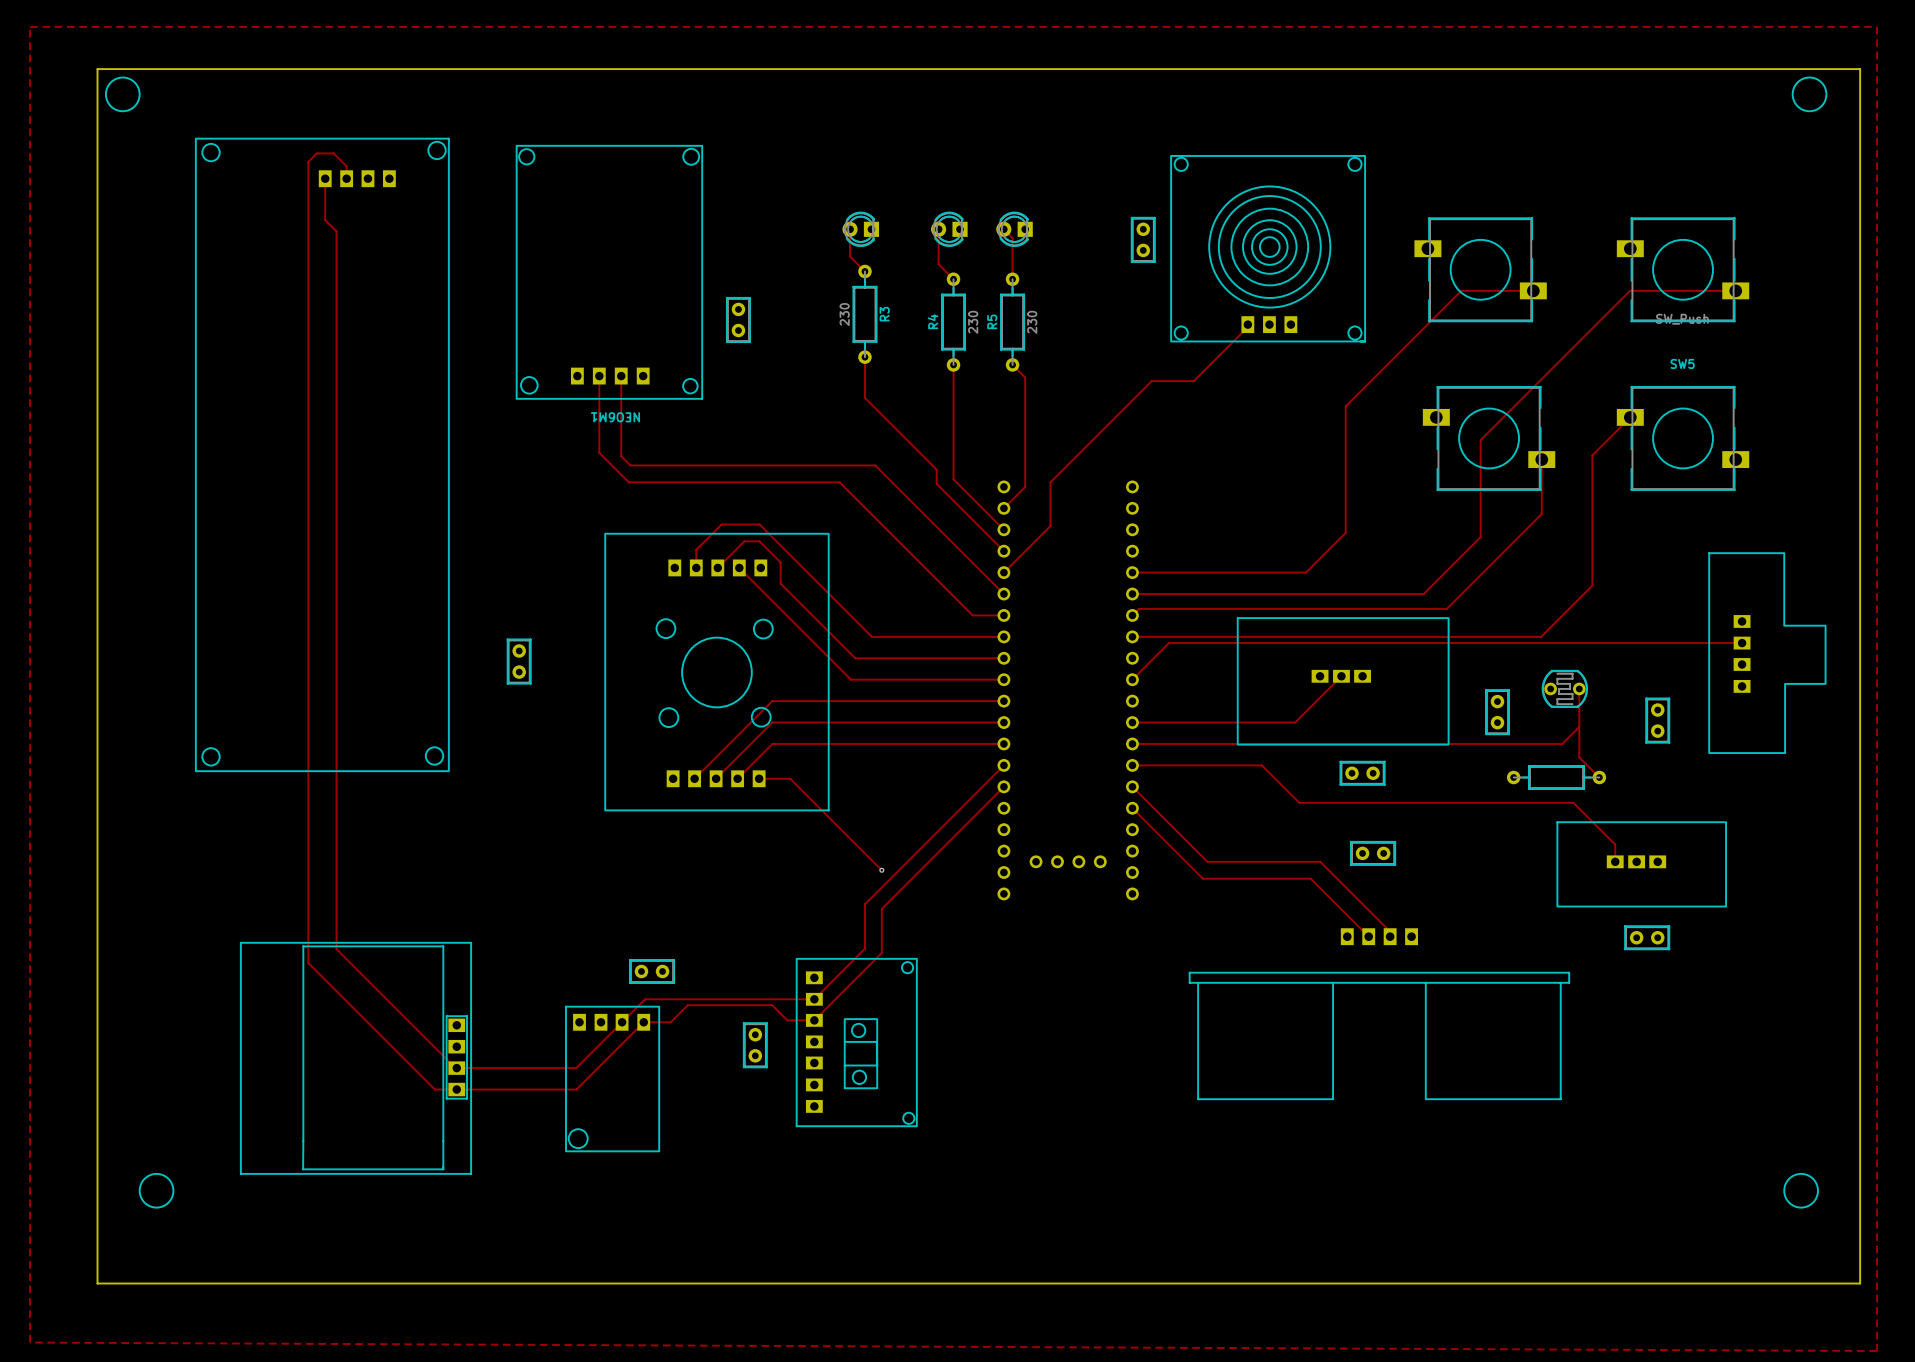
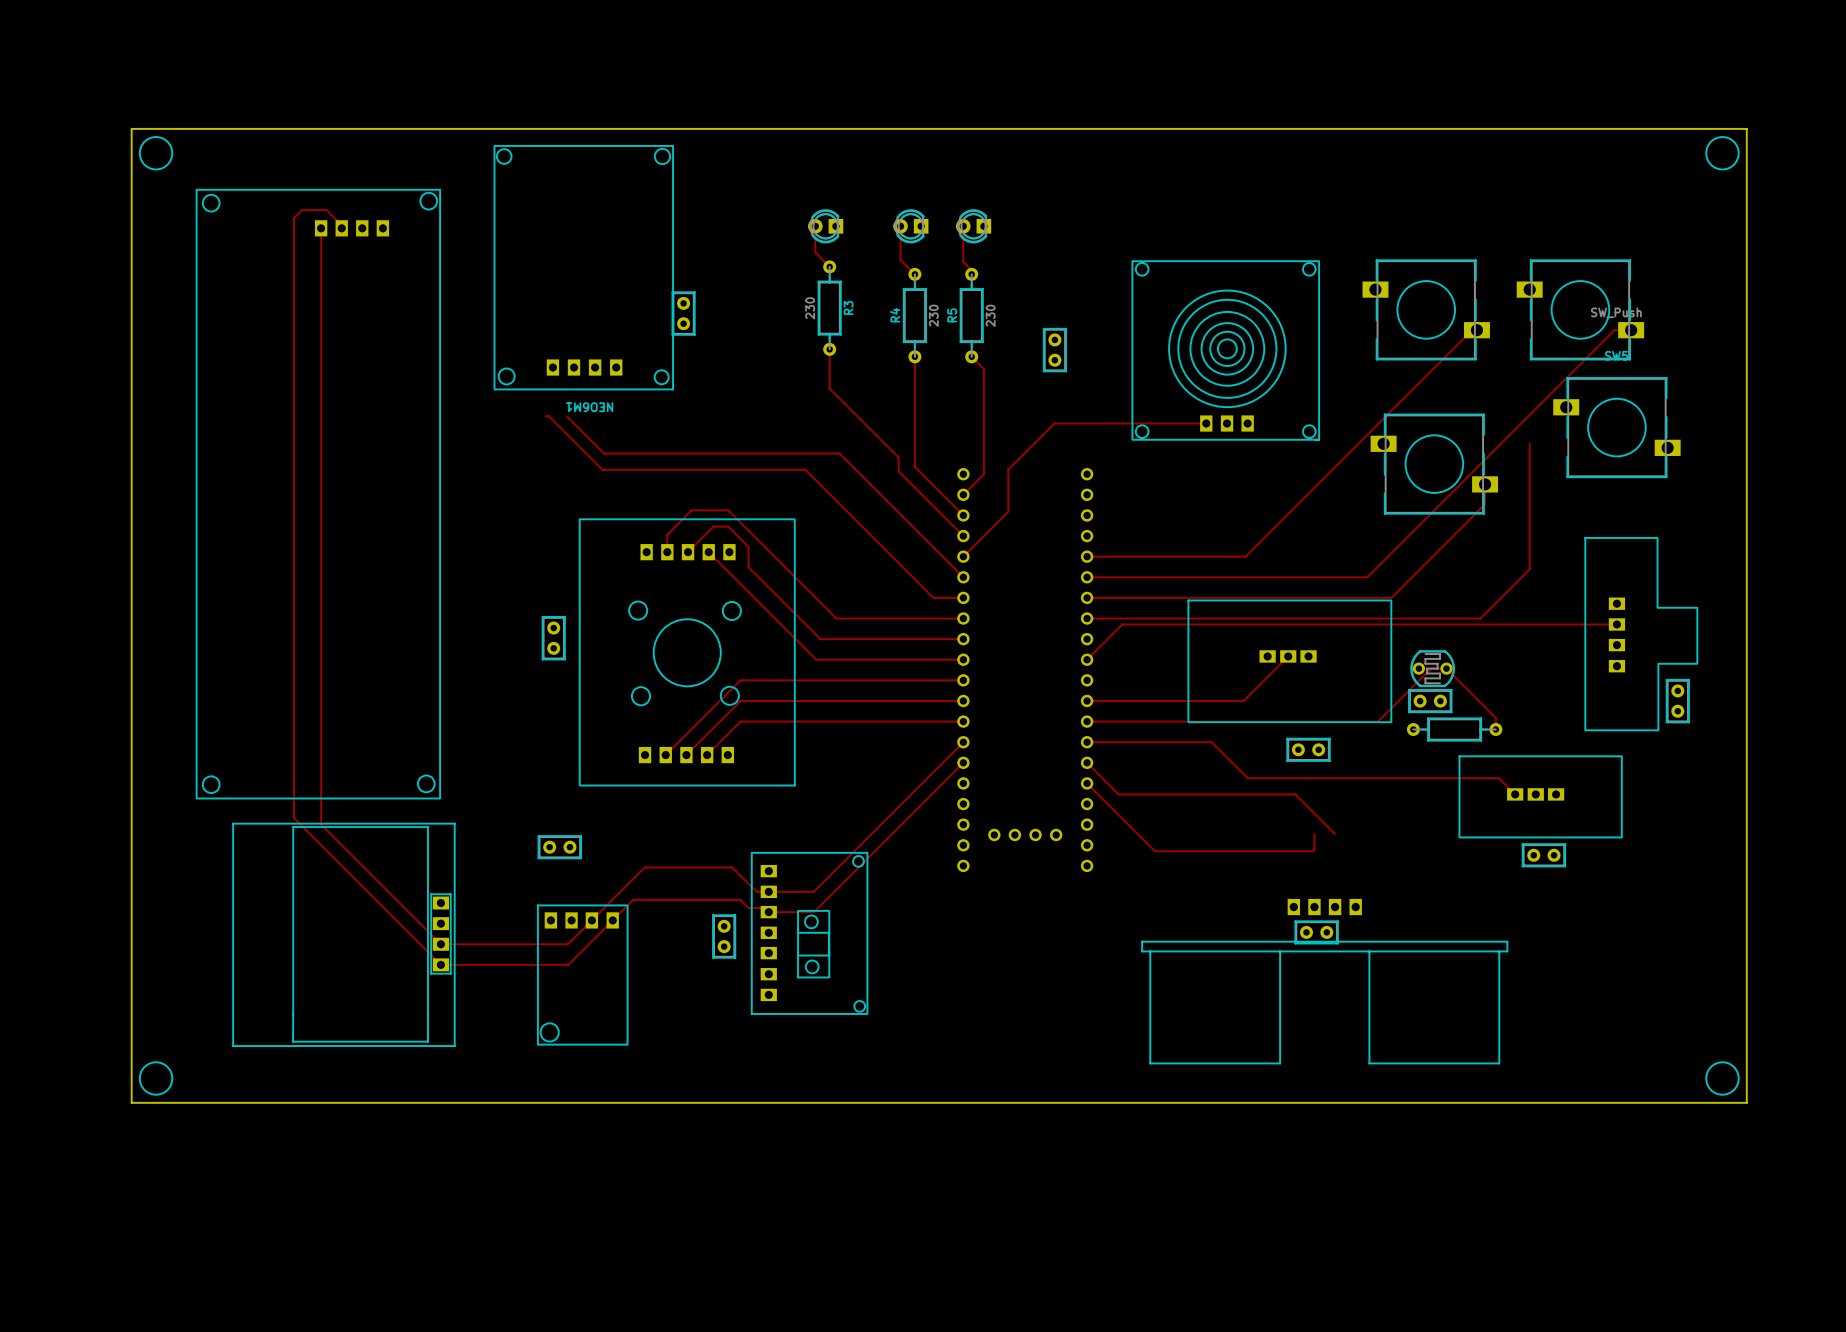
zone outline: (30, 26) (1877, 26) (1877, 1350) (30, 1342) (30, 26) -> none
board edge: (97, 69) (1860, 69) (1860, 1283) (97, 1283) (97, 69) -> (131, 128) (131, 1102) (1746, 1102) (1746, 128) (131, 128)
drawing position: (122, 94) -> (156, 153)
drawing position: (1809, 94) -> (1722, 153)
track: (325, 178) (325, 220) (336, 231) -> none
track: (346, 178) (346, 166) (333, 153) (316, 153) (308, 161) (308, 220) -> (341, 228) (341, 225) (326, 210) (302, 210) (294, 218)
track: (1003, 229) (1012, 238) (1012, 279) -> none
track: none -> (963, 234) (963, 261) (971, 270)
part position: (1143, 239) -> (1054, 350)
part position: (1268, 248) -> (1225, 350)
part position: (1480, 269) -> (1426, 309)
part position: (1683, 269) -> (1580, 309)
track: (1533, 290) (1461, 290) (1345, 406) (1345, 532) (1306, 572) (1297, 572) -> (1476, 330) (1472, 330) (1245, 556)
track: (1735, 290) (1629, 290) (1480, 440) (1480, 537) -> (1631, 330) (1614, 330) (1422, 522)
part position: (738, 319) -> (683, 313)
track: (1247, 324) (1247, 327) (1193, 381) (1151, 381) (1098, 434) -> (1206, 423) (1054, 423)
track: (599, 376) (599, 452) -> (545, 416) (548, 416) (574, 441)
track: (621, 376) (621, 456) -> (566, 416) (595, 444)
track: (1630, 417) (1592, 455) -> none
part position: (1489, 438) -> (1434, 464)
part position: (322, 454) -> (318, 494)
track: (1541, 459) (1541, 513) (1446, 608) (1139, 608) (1132, 615) -> (1485, 484) (1485, 504) (1391, 597) (1087, 597)
track: (1683, 643) (1742, 643) -> none
part position: (1767, 653) -> (1641, 634)
part position: (519, 661) -> (553, 638)
part position: (1564, 688) -> (1432, 668)
track: (1579, 688) (1579, 757) (1599, 777) -> none
part rotation: 0° (1497, 712) -> 90° clockwise (1430, 701)
part: (1657, 720) -> none
part: none -> (1677, 701)
track: (1579, 726) (1562, 743) (1434, 743) -> (1495, 729) (1495, 717) (1446, 668) (1430, 668) (1378, 721)
part position: (1556, 777) -> (1454, 729)
track: (759, 778) (790, 778) (881, 870) -> none
track: (1560, 802) (1573, 802) (1615, 844) (1615, 861) -> (1498, 778) (1515, 794)
track: (1165, 819) (1207, 861) (1320, 861) (1390, 931) (1390, 936) -> (1118, 794) (1295, 794) (1335, 834)
track: (308, 844) (308, 963) (434, 1089) (576, 1089) (643, 1022) (670, 1022) (687, 1005) (772, 1005) (787, 1020) (814, 1020) -> (294, 817) (440, 964) (568, 964) (633, 899) (740, 899) (748, 908) (764, 908) (768, 912) (814, 912) (845, 880)
track: (336, 850) (336, 949) (455, 1068) (576, 1068) (645, 999) (814, 999) (864, 948) (865, 904) -> (321, 824) (440, 944) (568, 944) (644, 867) (732, 867) (756, 891) (813, 891) (830, 875)
part: (1373, 853) -> none
part position: (1641, 864) -> (1540, 796)
via: (881, 870) -> none
part: none -> (559, 847)
track: (1310, 878) (1368, 936) -> (1258, 851) (1312, 851) (1314, 849) (1314, 834)
track: (881, 908) (881, 952) (812, 1022) -> none
part position: (1647, 937) -> (1543, 855)
part: none -> (1316, 932)
part: none -> (724, 936)
part: (652, 971) -> none
part position: (856, 1042) -> (809, 933)
part: (755, 1045) -> none
part position: (356, 1058) -> (343, 934)
part position: (612, 1079) -> (582, 975)
drawing position: (156, 1190) -> (156, 1078)
drawing position: (1801, 1190) -> (1722, 1078)

